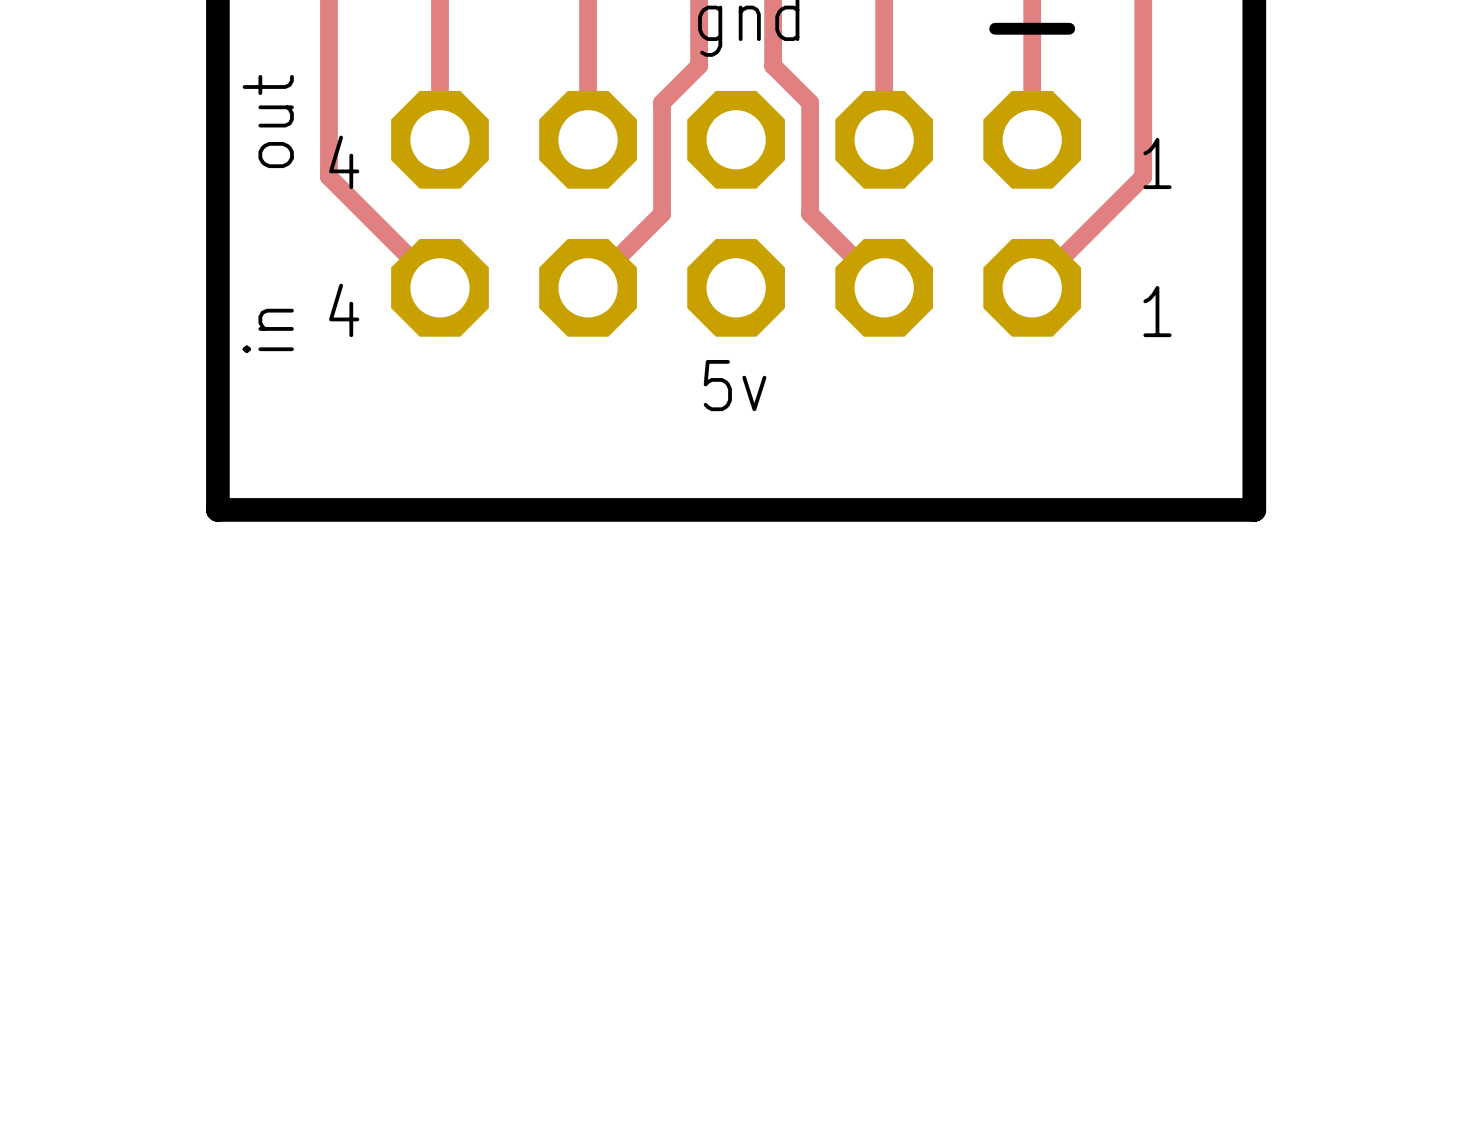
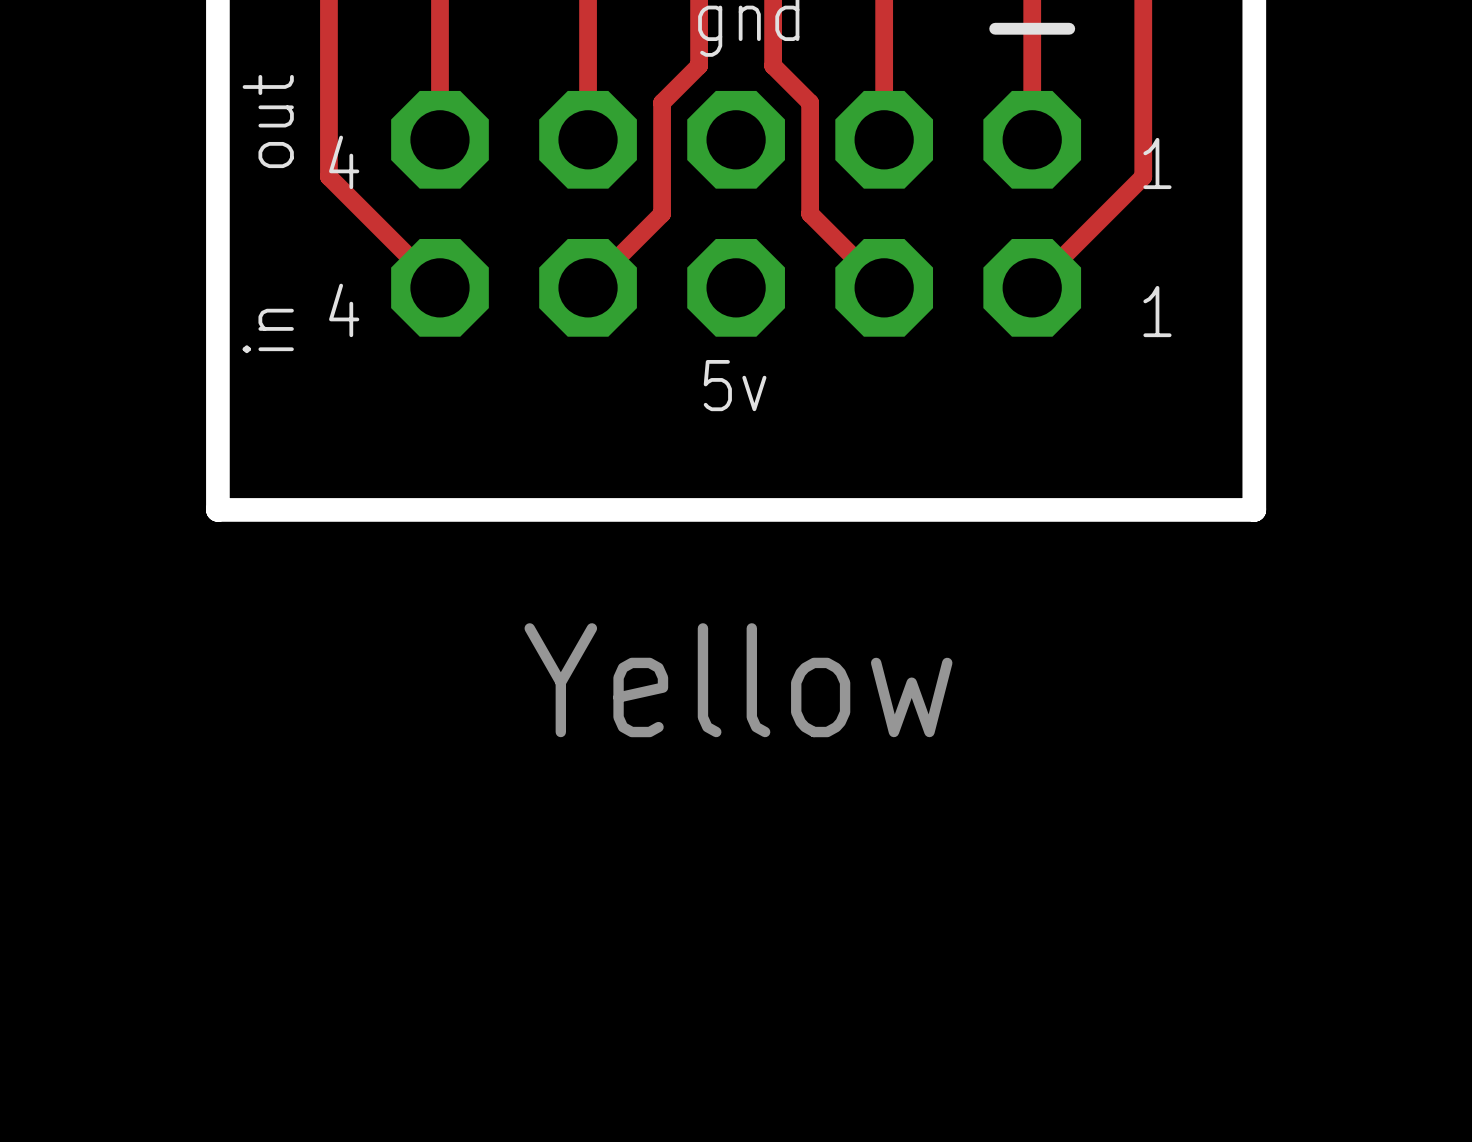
text: none -> Yellow (738, 680)

